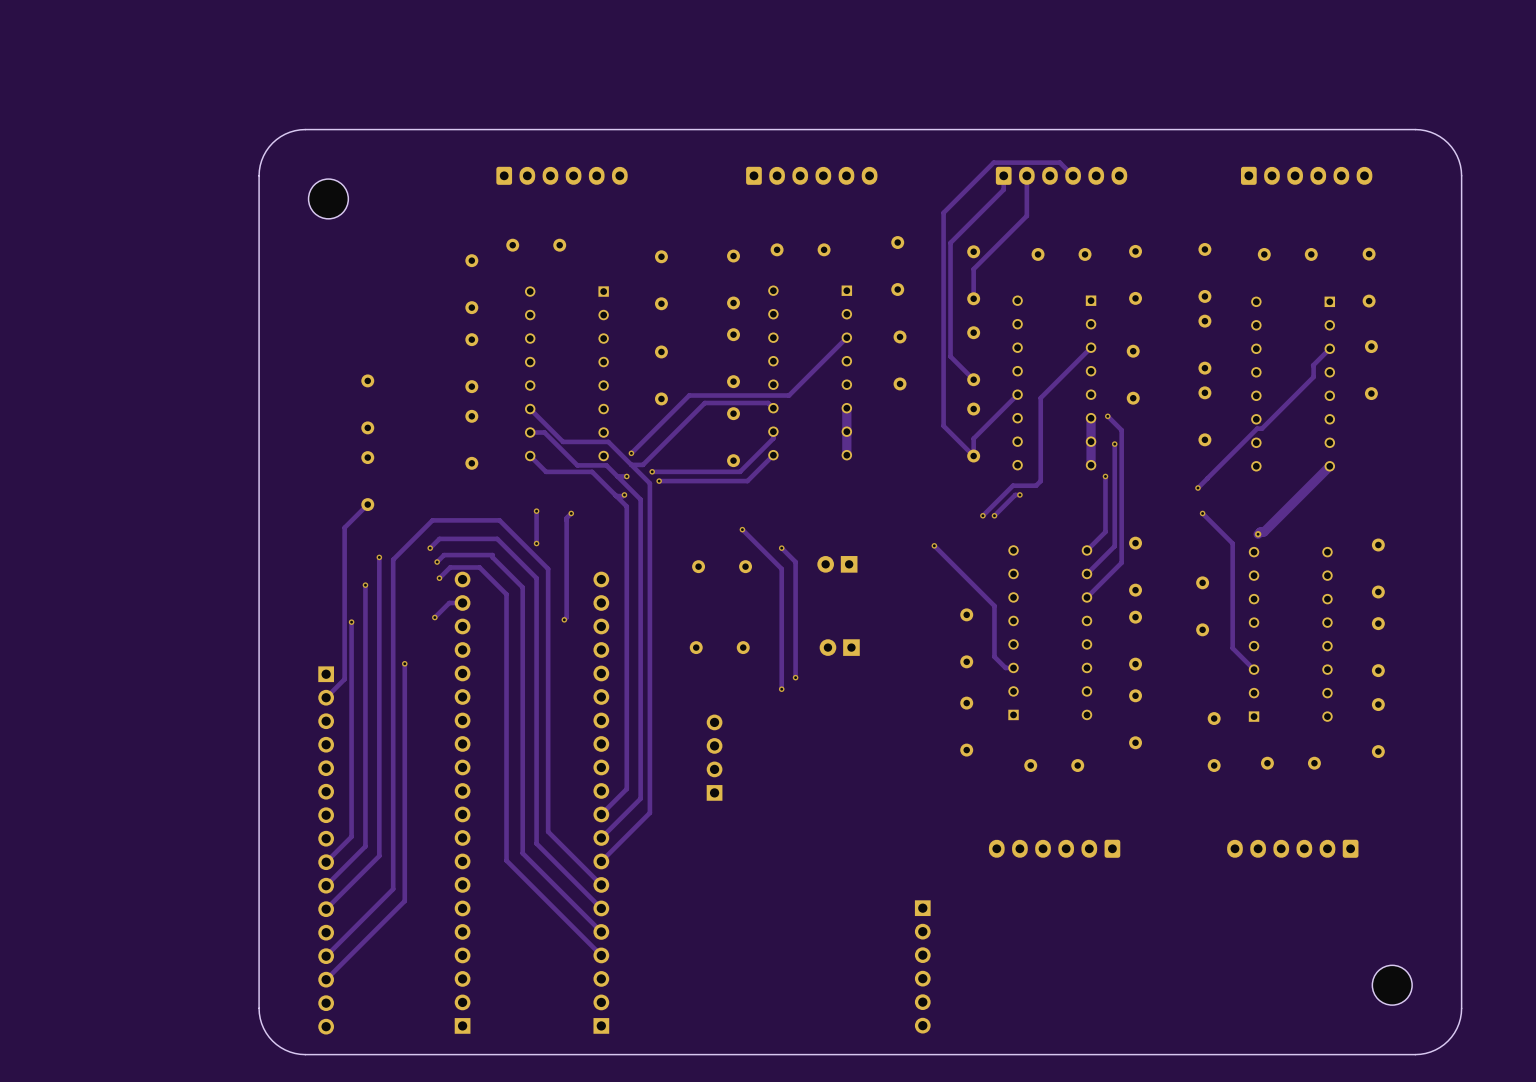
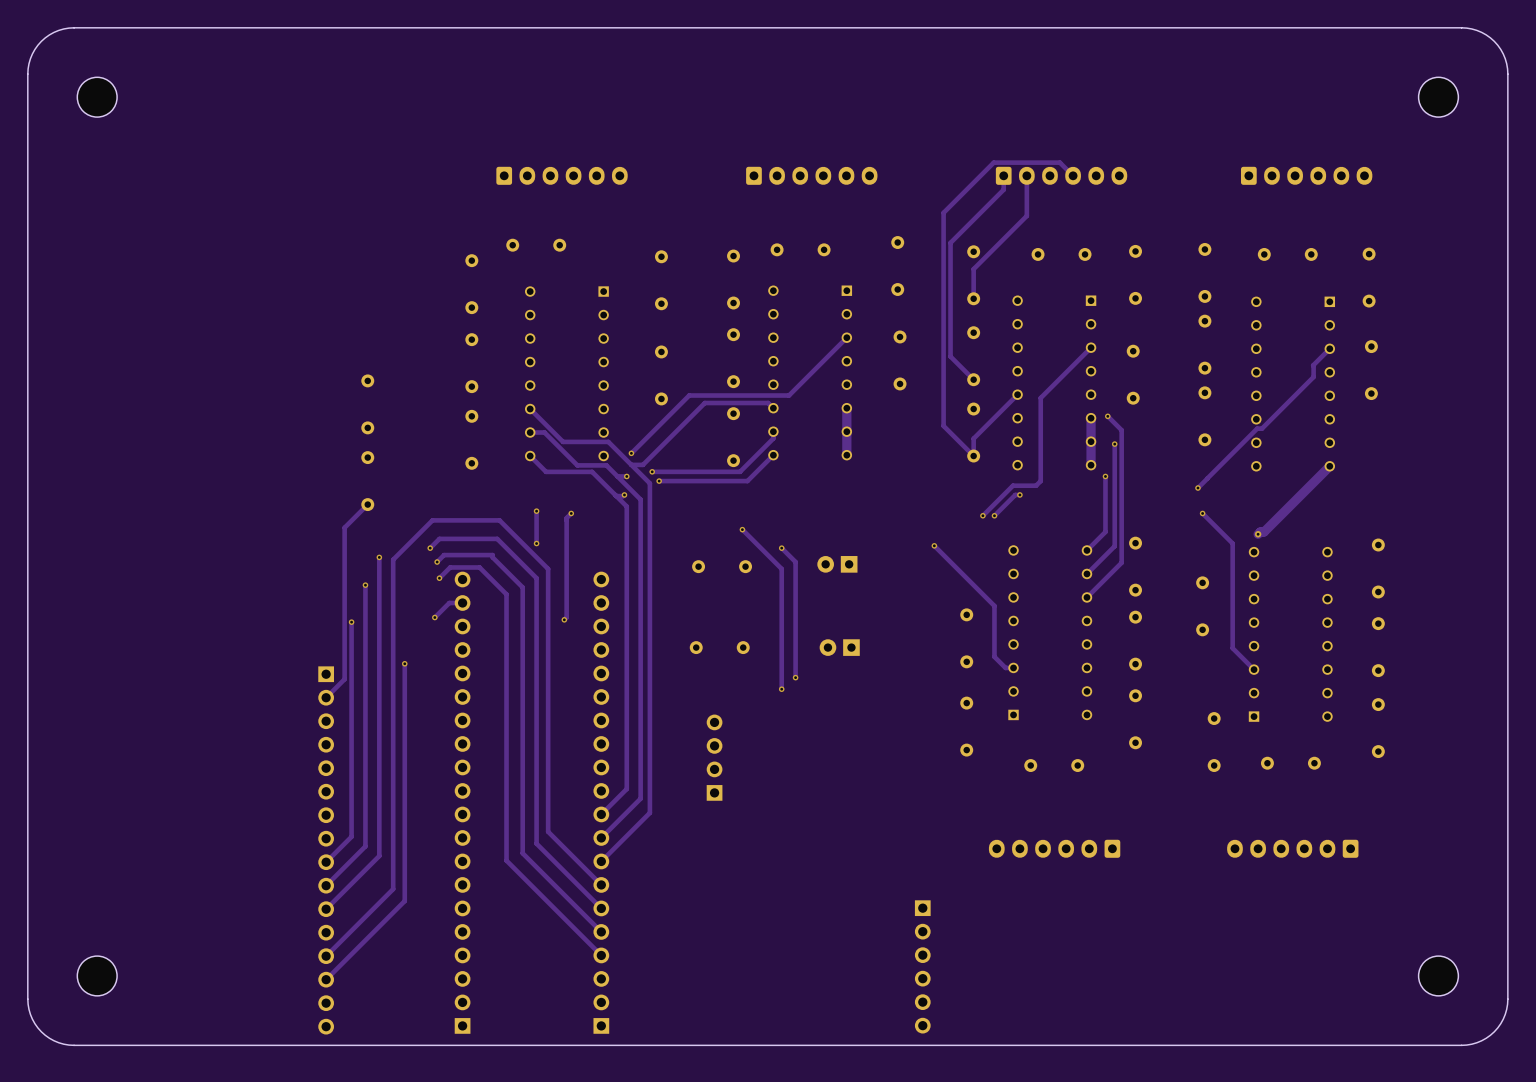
part: none -> (97, 97)
part: none -> (1438, 97)
board edge: (1415, 129) (305, 129) (290, 132) (276, 139) (263, 155) (259, 175) (259, 1008) (261, 1023) (269, 1037) (285, 1050) (305, 1054) (1415, 1054) (1430, 1052) (1444, 1044) (1457, 1028) (1461, 1008) (1461, 175) (1459, 160) (1448, 143) (1430, 132) (1415, 129) -> (1461, 27) (1476, 30) (1494, 41) (1505, 58) (1507, 74) (1507, 999) (1506, 1009) (1500, 1023) (1486, 1038) (1471, 1044) (1461, 1045) (74, 1045) (58, 1042) (49, 1038) (34, 1023) (30, 1014) (27, 999) (27, 74) (32, 54) (41, 41) (49, 34) (58, 30) (74, 27) (1461, 27)
part: (328, 198) -> none
part: none -> (97, 975)
part position: (1392, 985) -> (1438, 975)

